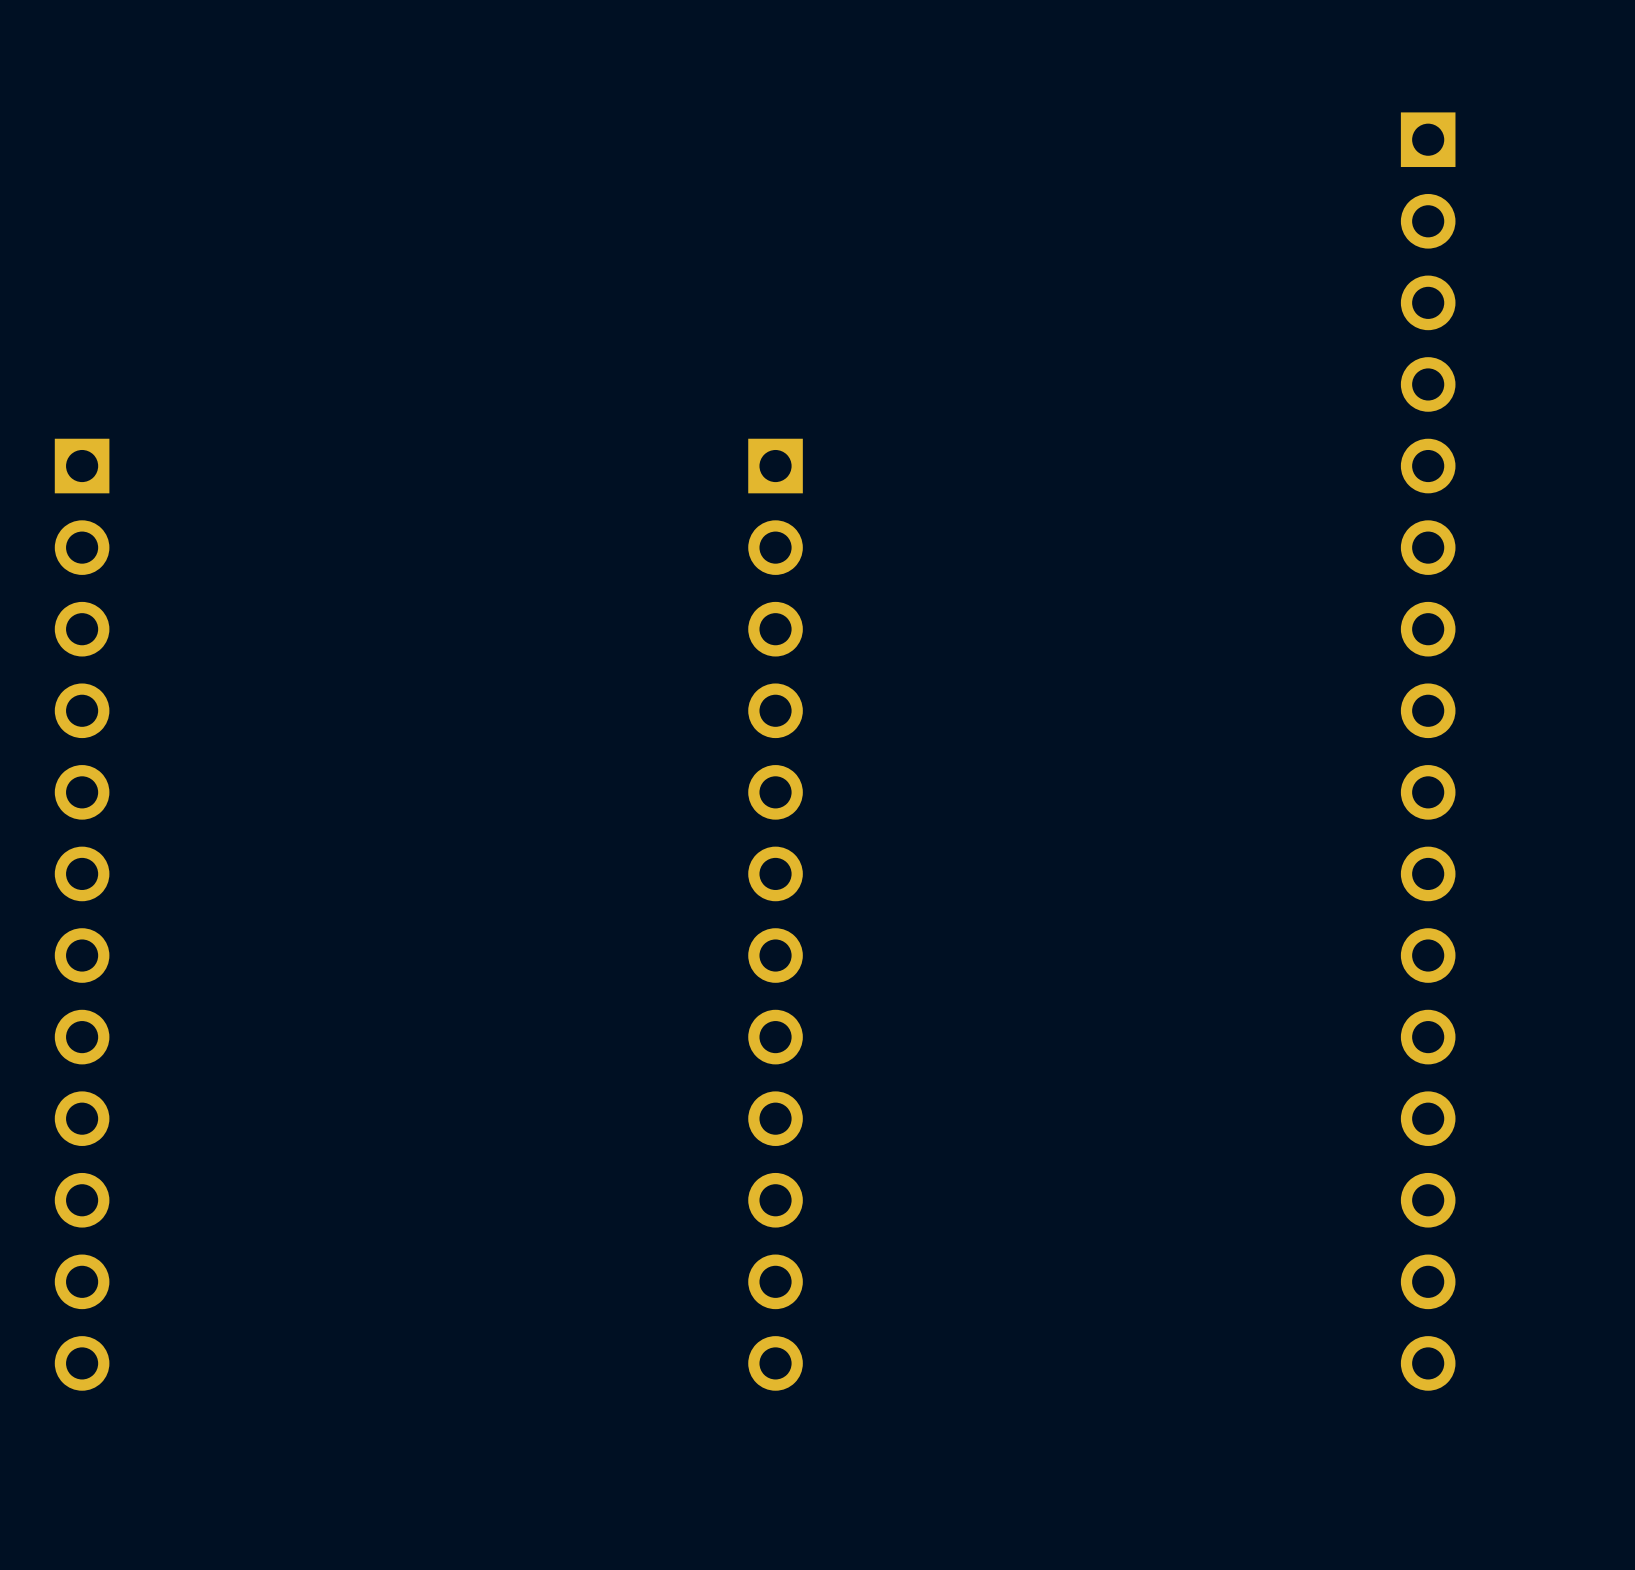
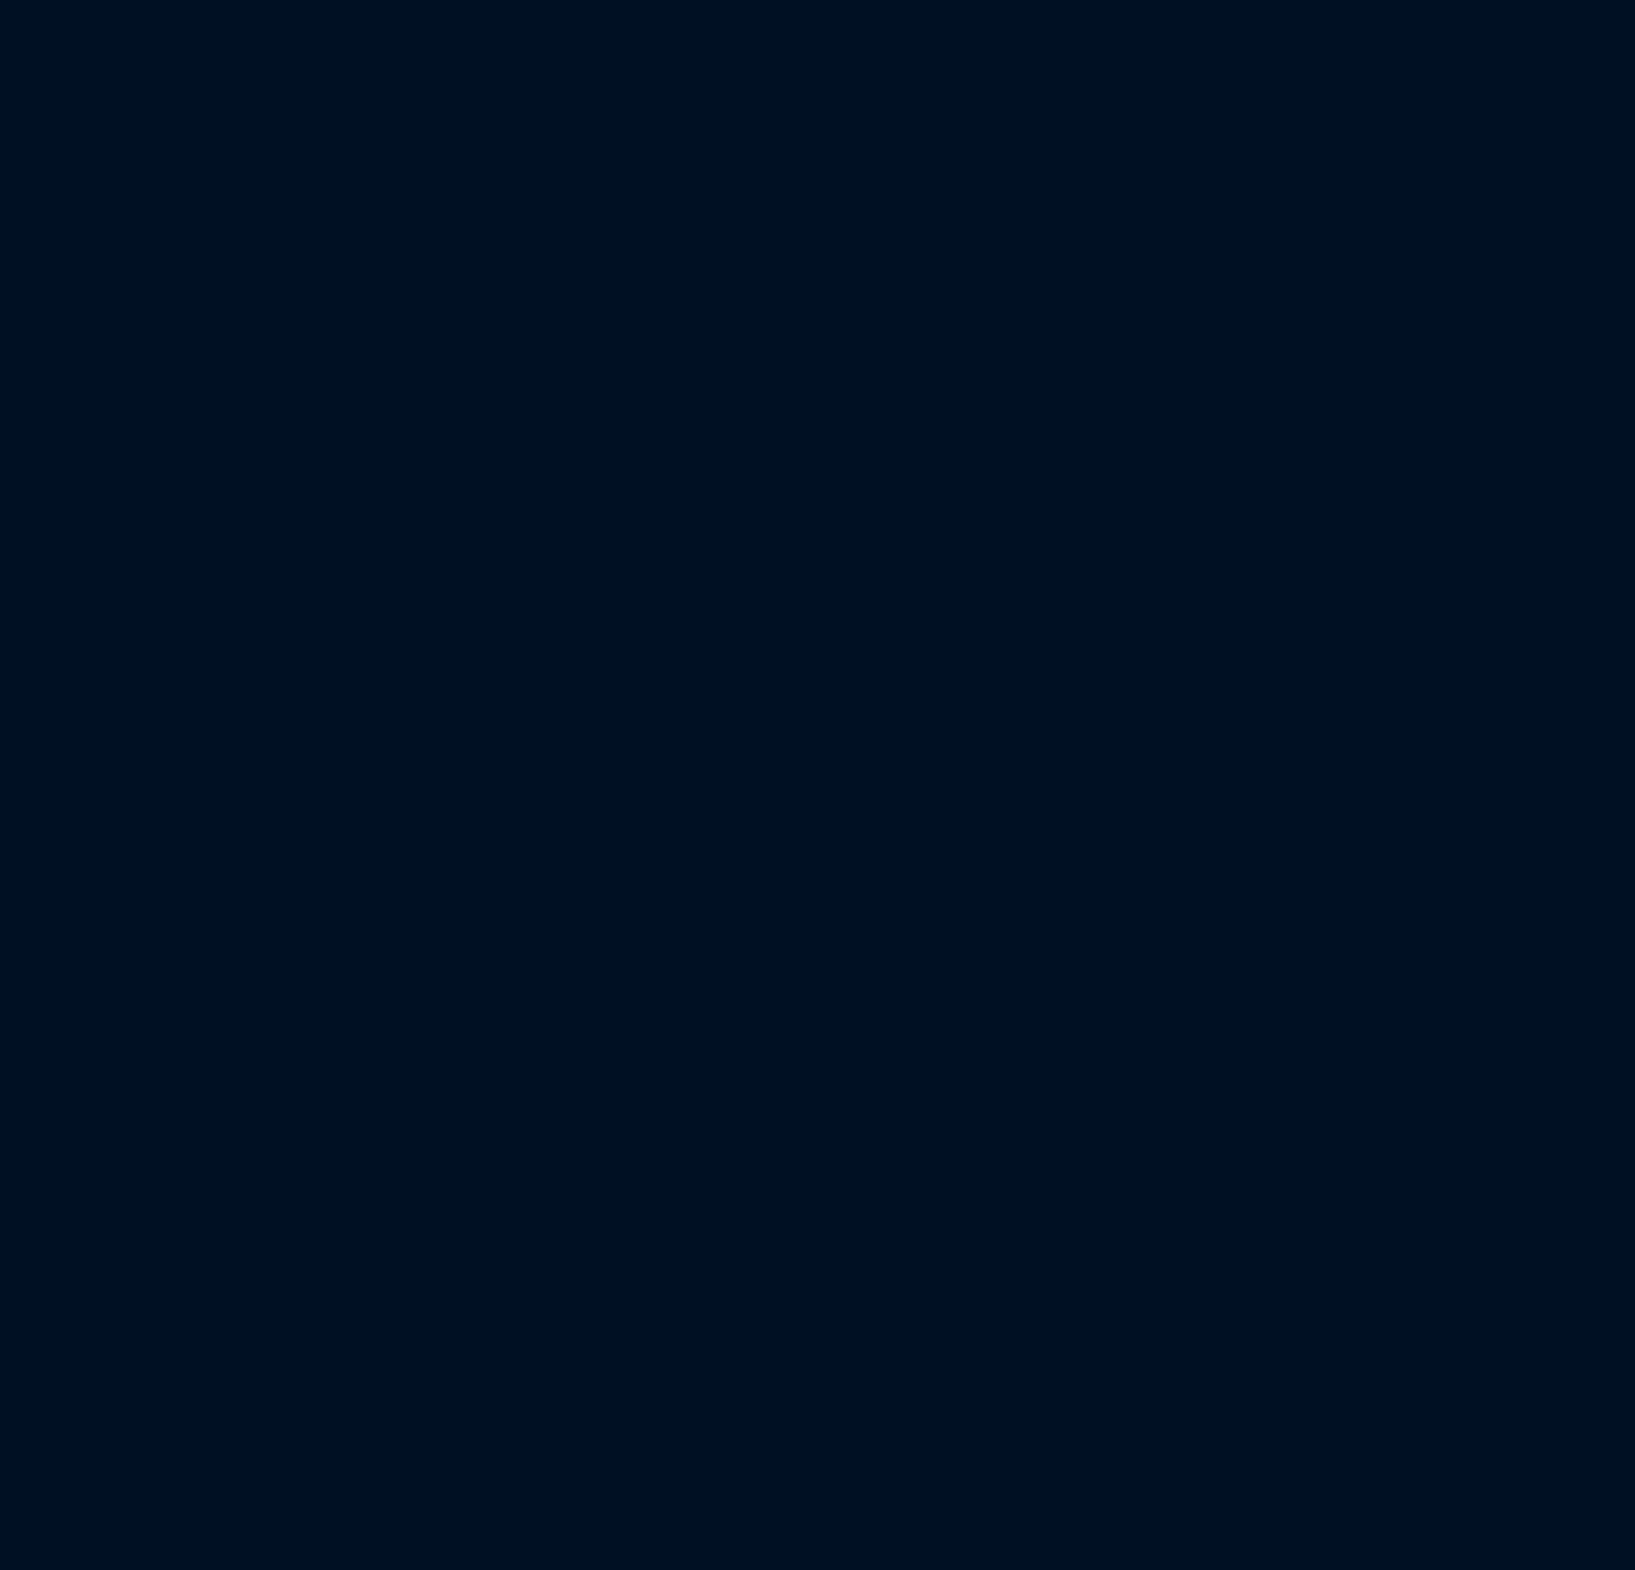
part: (1428, 751) -> none
part: (82, 914) -> none
part: (775, 914) -> none

